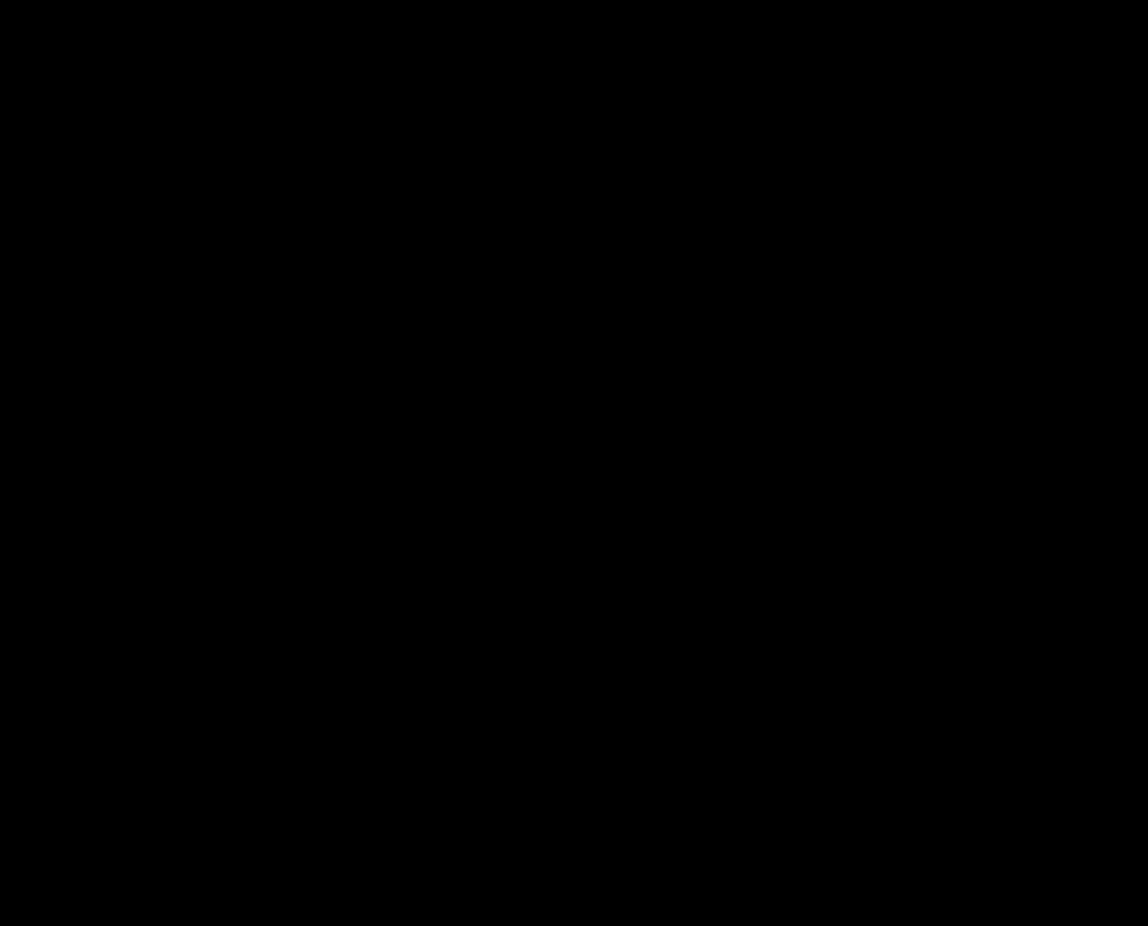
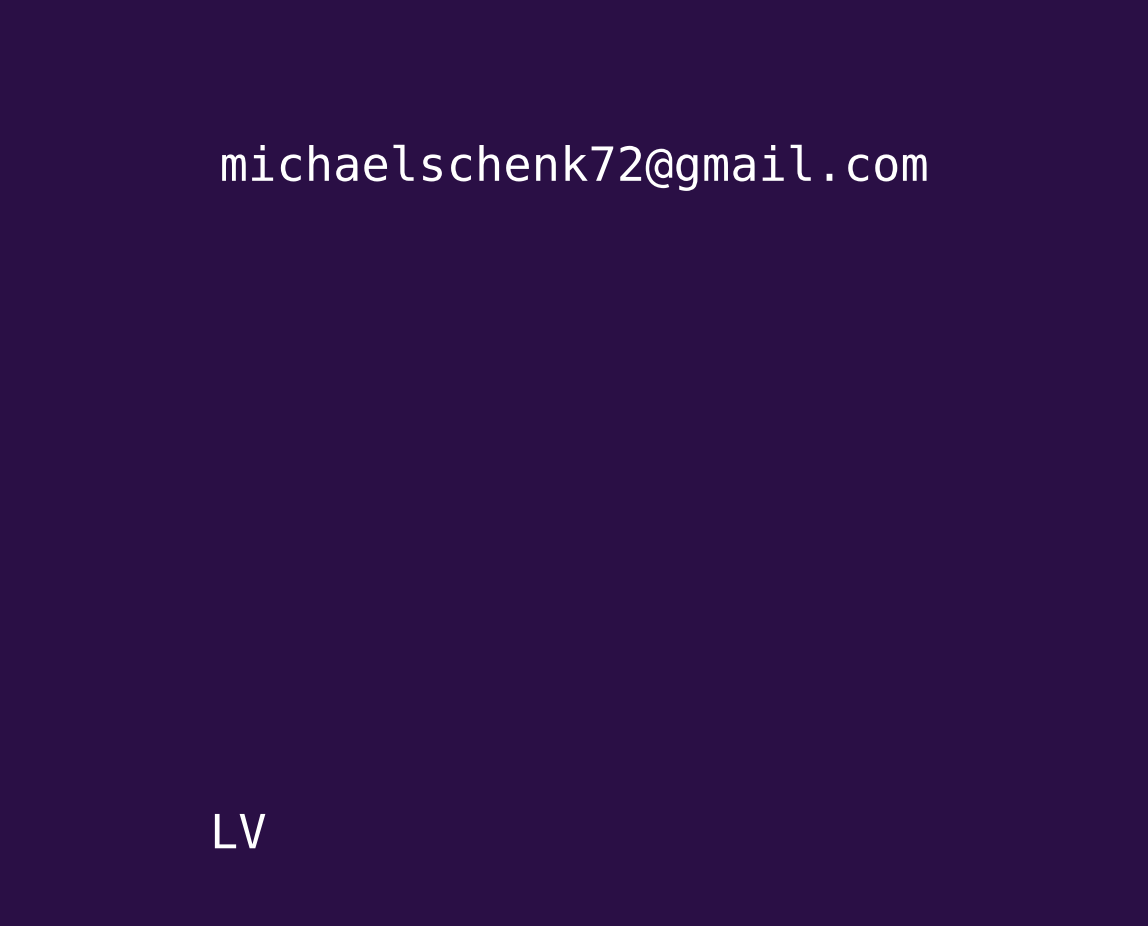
text: none -> michaelschenk72@gmail.com (574, 167)
text: none -> LV (240, 831)

